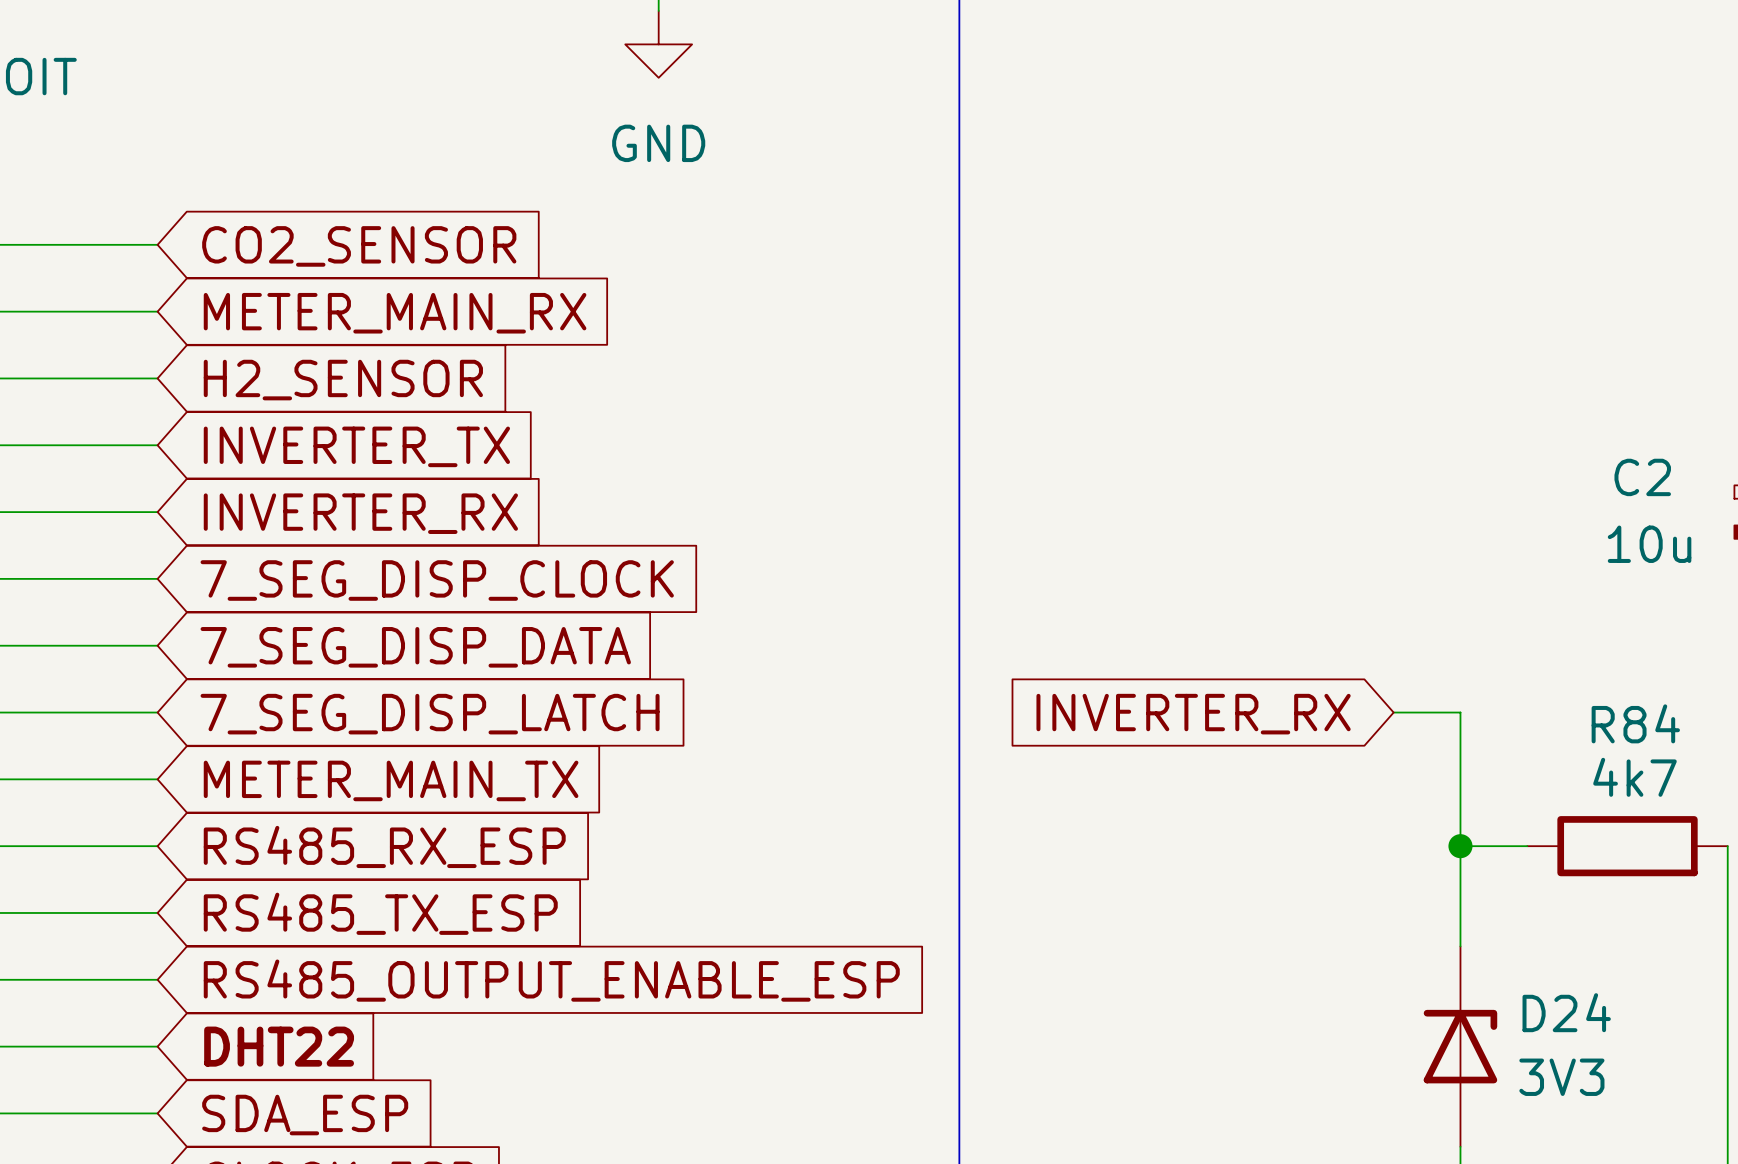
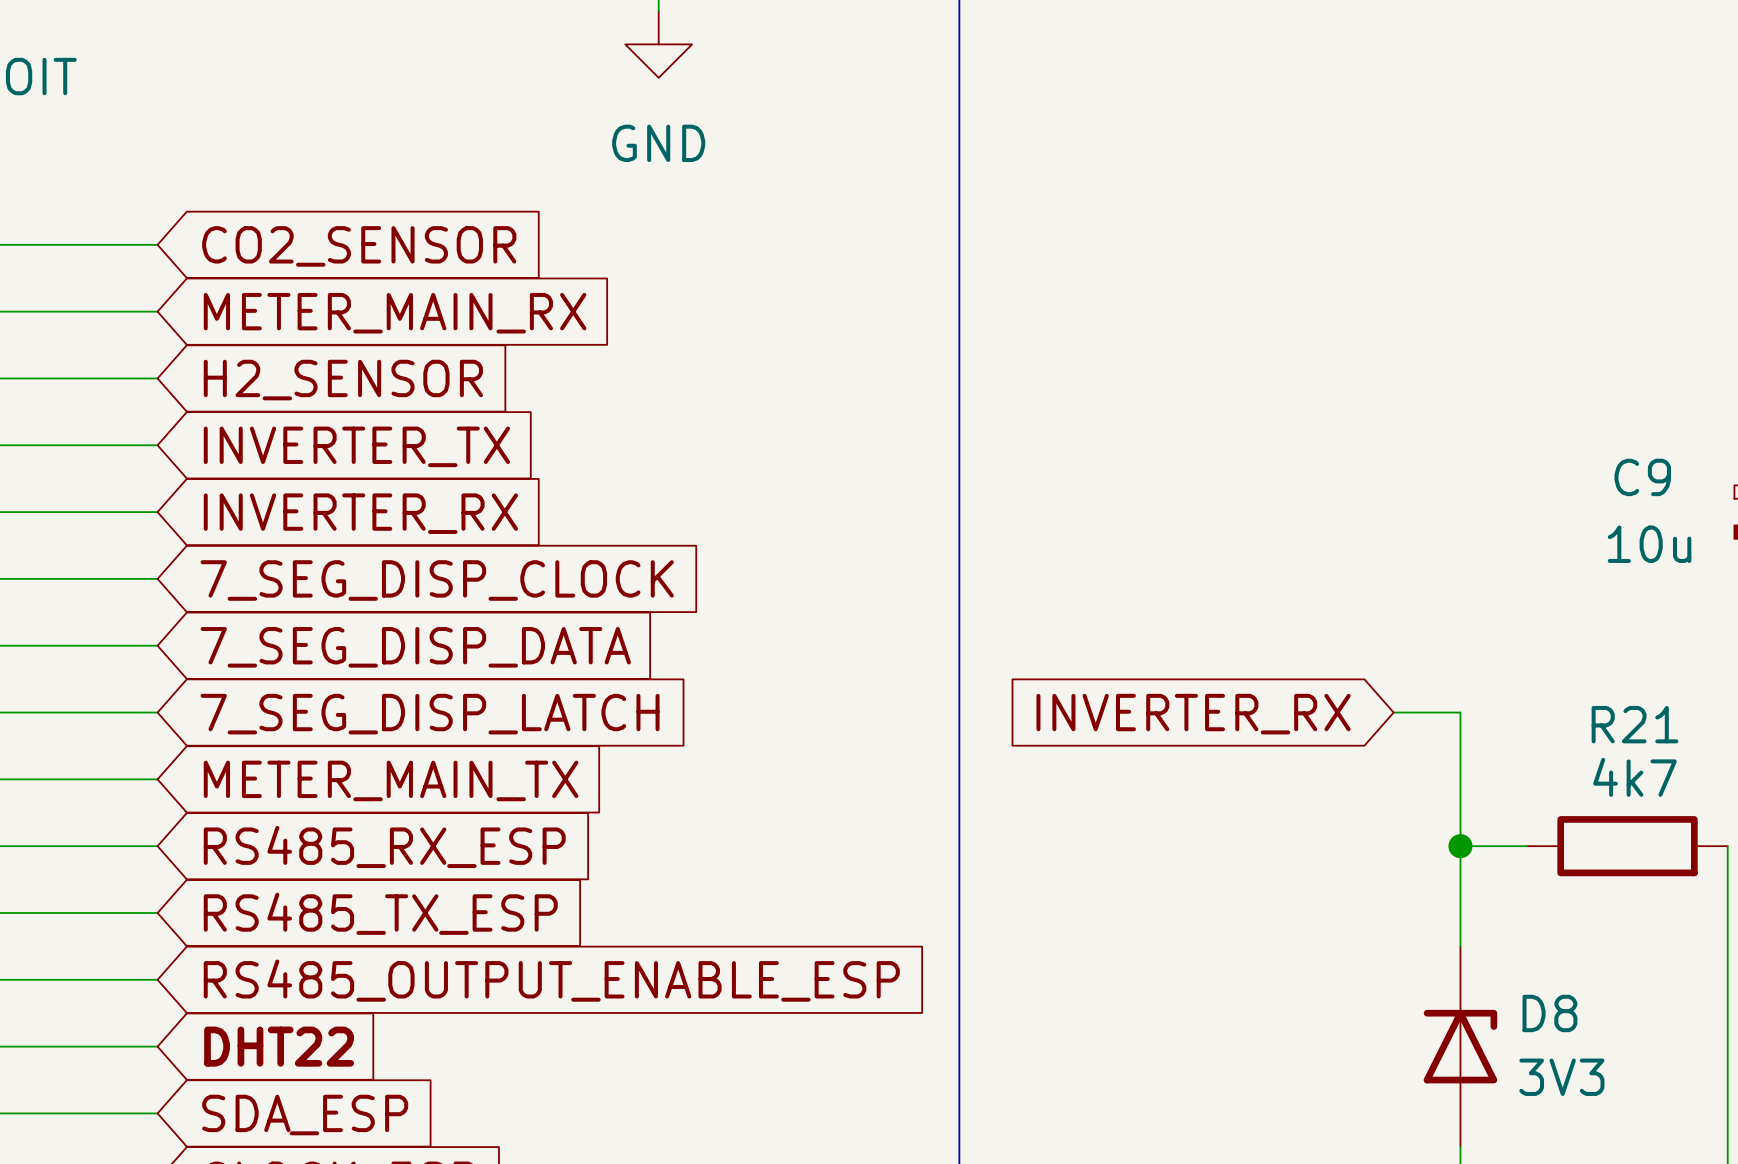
C2 name: C2 (1642, 477) -> C9 (1642, 477)
R84 name: R84 (1635, 723) -> R21 (1634, 724)
D24 name: D24 (1566, 1012) -> D8 (1549, 1013)

